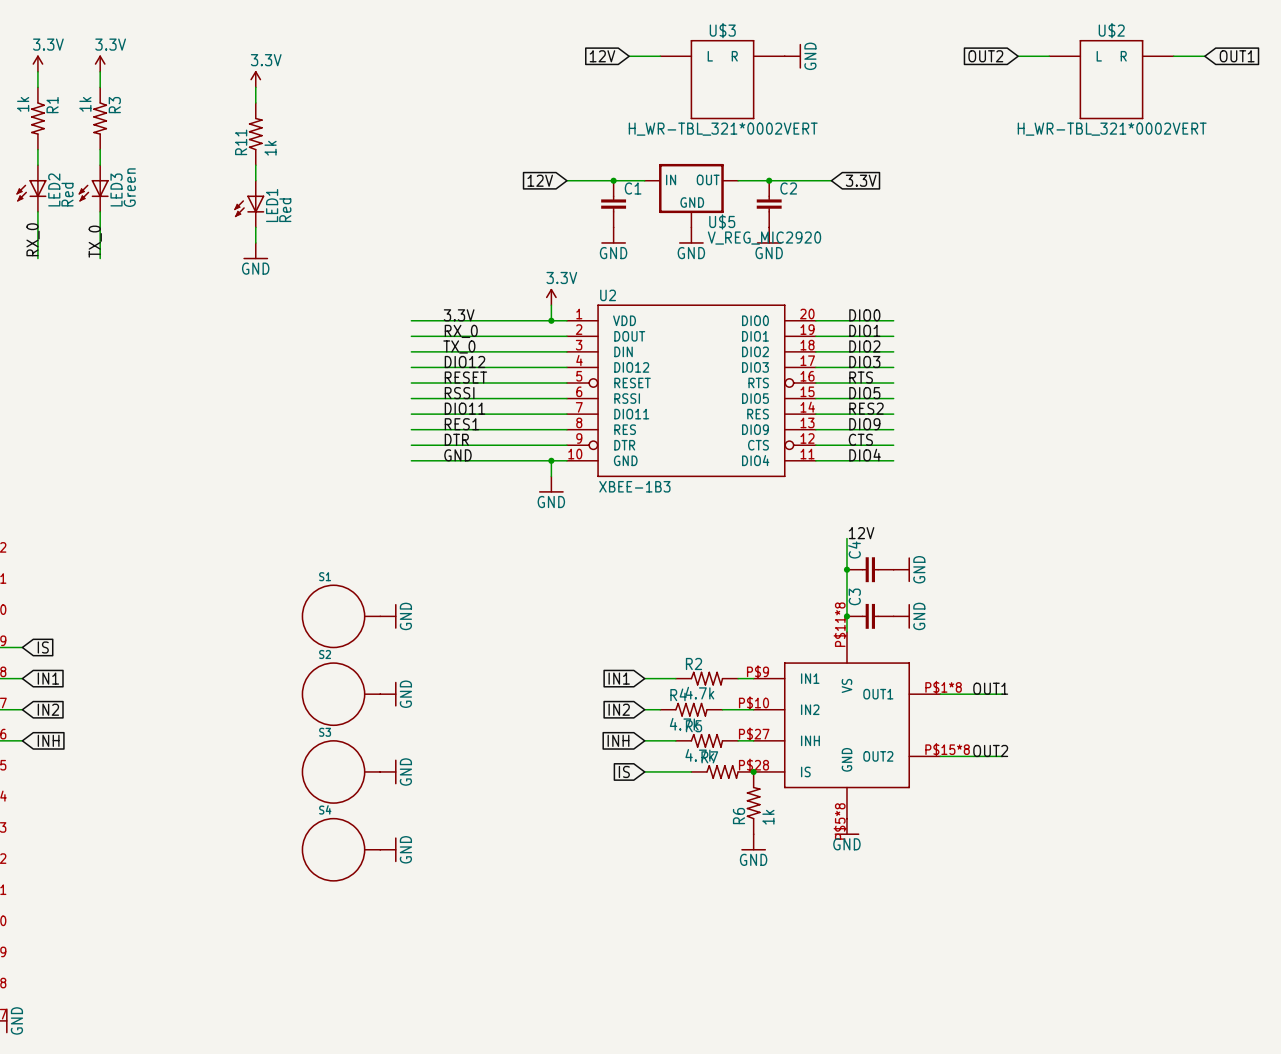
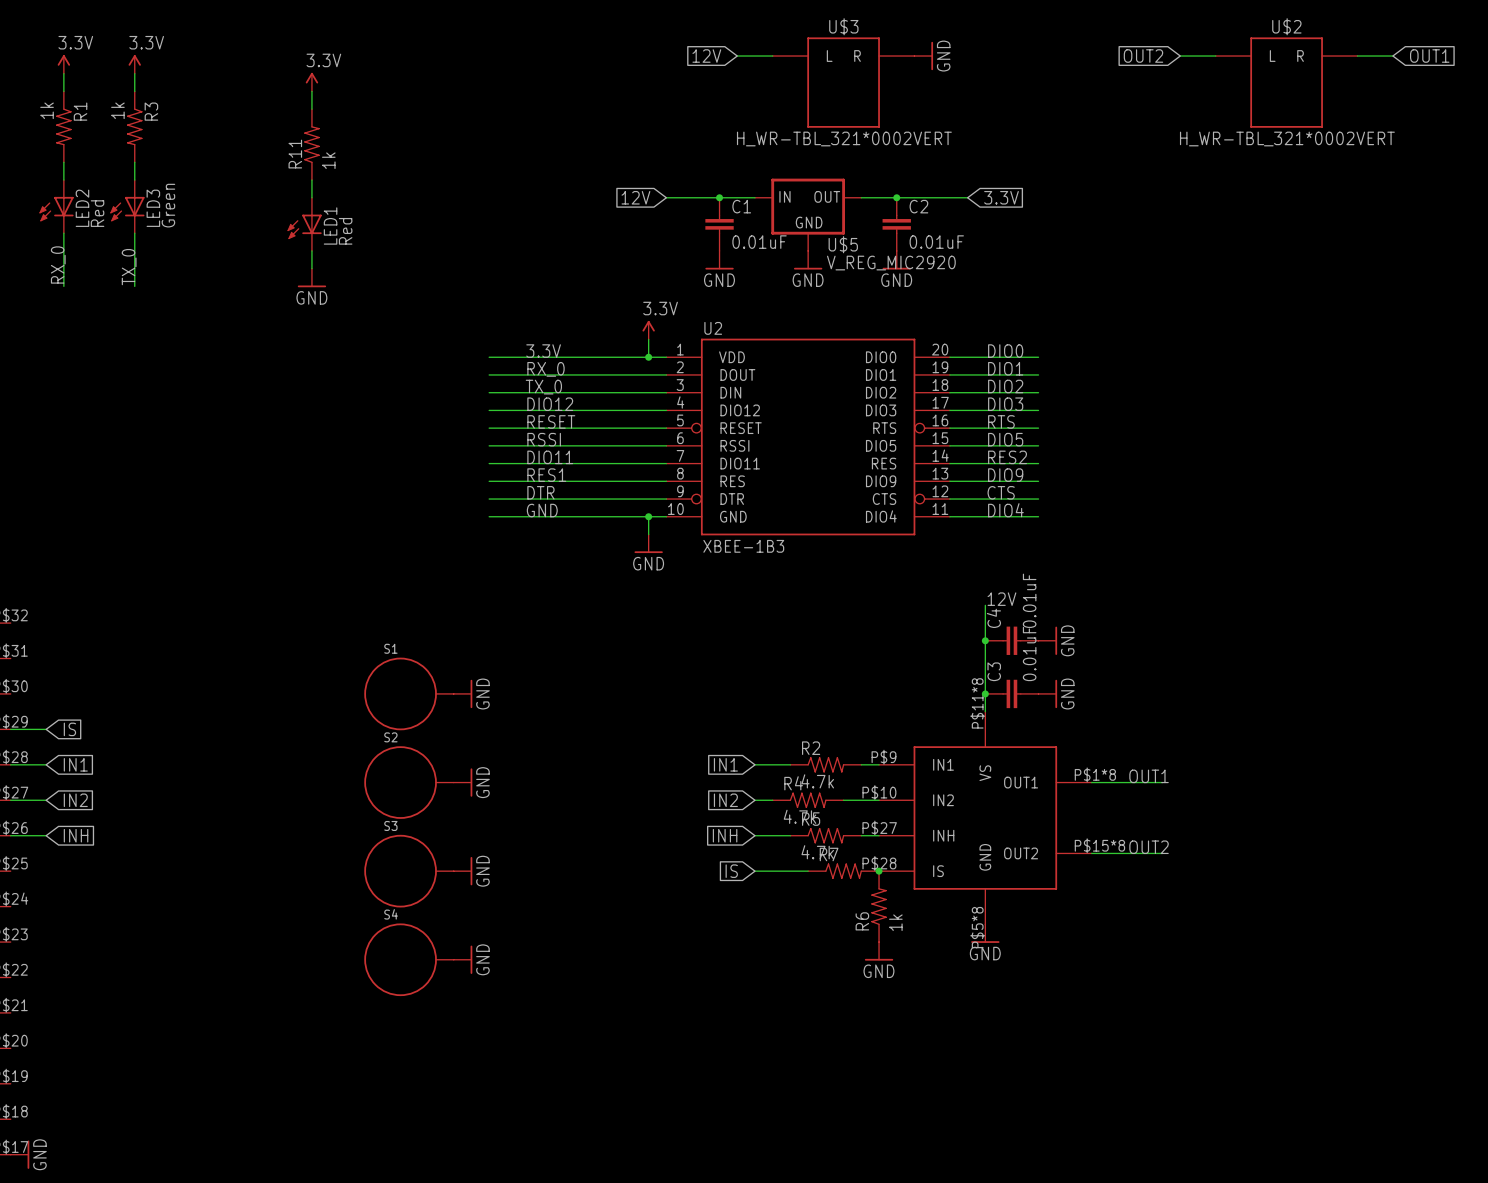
C1 value: none -> 0.01uF (759, 242)
C2 value: none -> 0.01uF (936, 242)
C4 value: none -> 0.01uF (1029, 600)
C3 value: none -> 0.01uF (1029, 653)

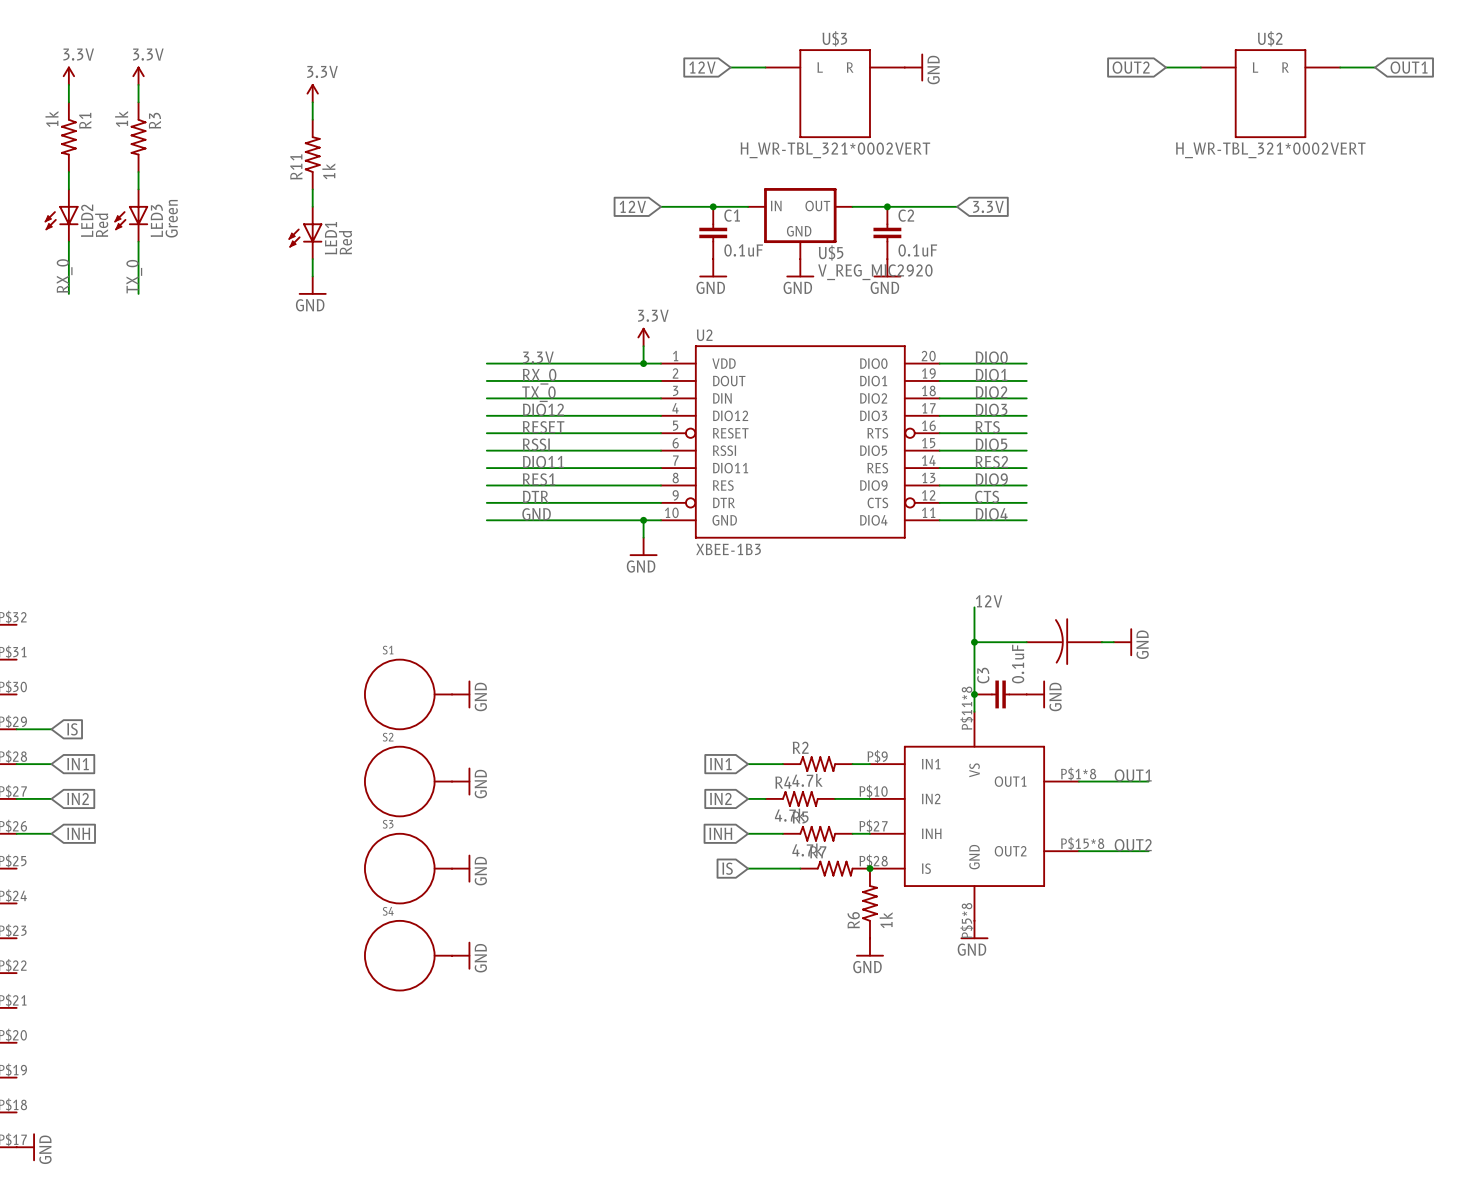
C1 value: 0.01uF (759, 242) -> 0.1uF (743, 250)
C2 value: 0.01uF (936, 242) -> 0.1uF (917, 250)
C4: 0.01uF (1011, 640) -> none
power symbol position: GND (1047, 640) -> GND (1122, 642)
part: none -> (1064, 641)
wire: none -> (1101, 642) (1113, 642)
C3 value: 0.01uF (1029, 653) -> 0.1uF (1018, 664)

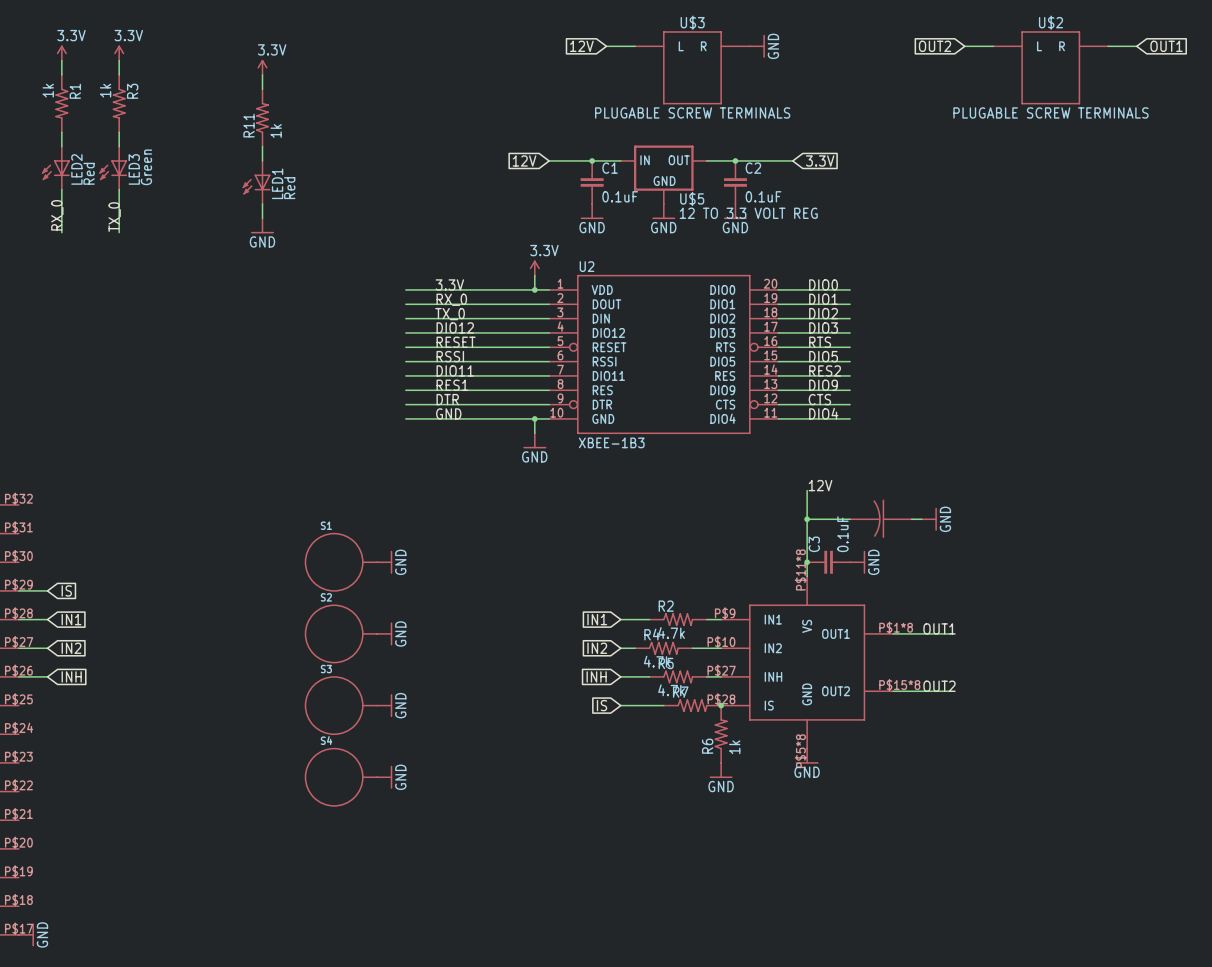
U$3 value: H_WR-TBL_321*0002VERT (835, 150) -> PLUGABLE SCREW TERMINALS (692, 112)
U$2 value: H_WR-TBL_321*0002VERT (1270, 150) -> PLUGABLE SCREW TERMINALS (1050, 112)
U$5 value: V_REG_MIC2920 (875, 272) -> 12 TO 3.3 VOLT REG (748, 213)

